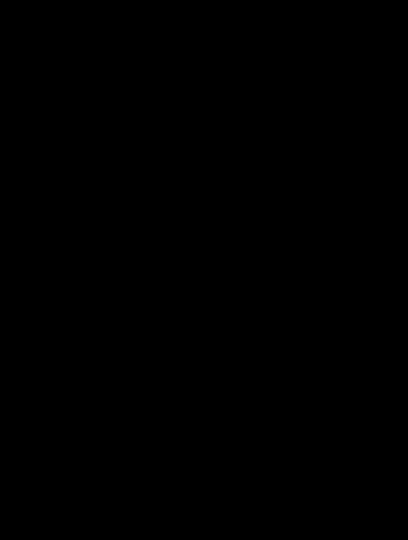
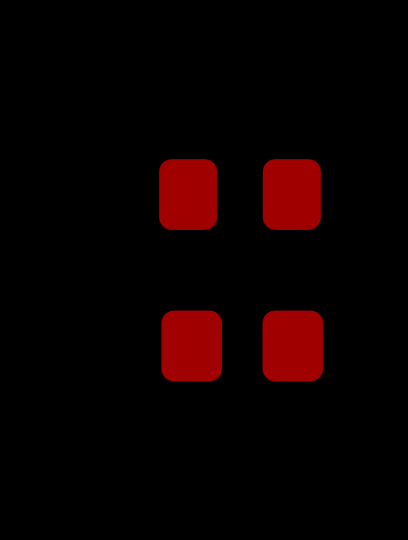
part: none -> (240, 194)
part: none -> (242, 345)

